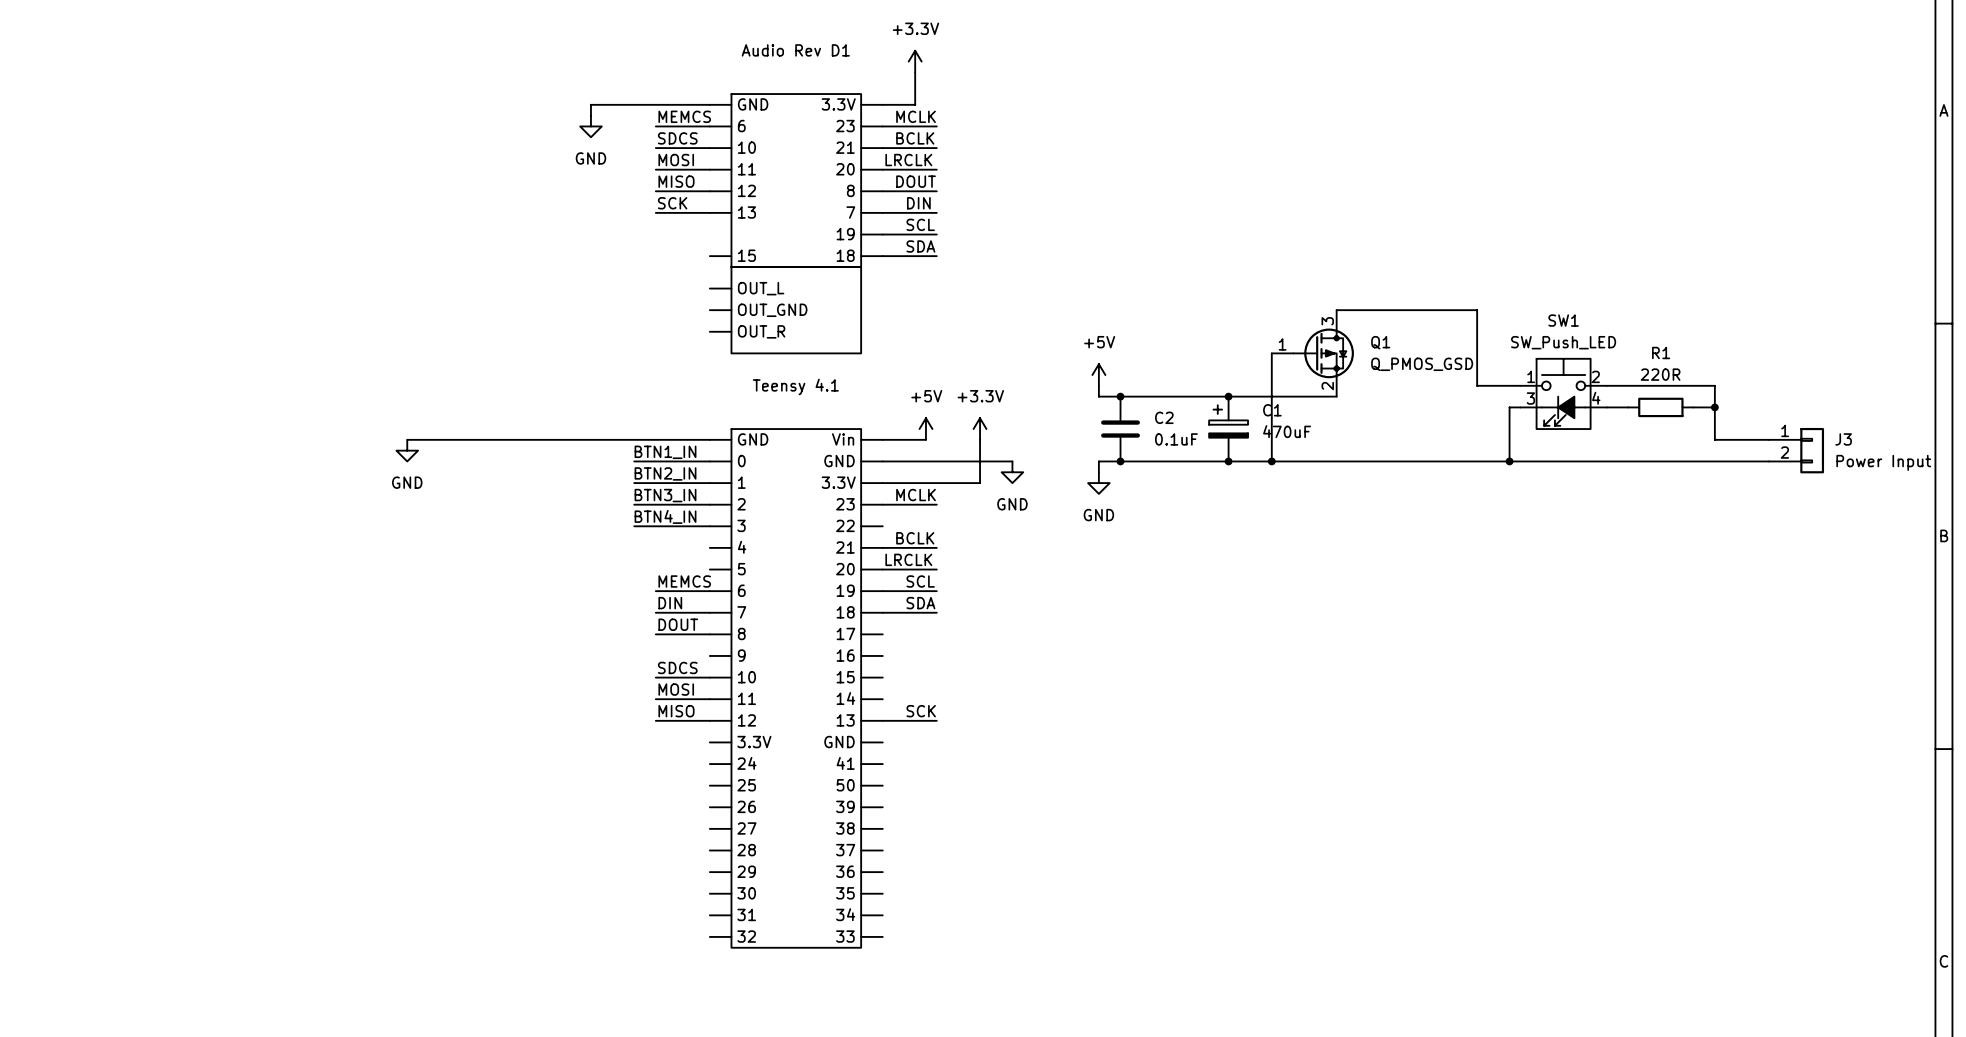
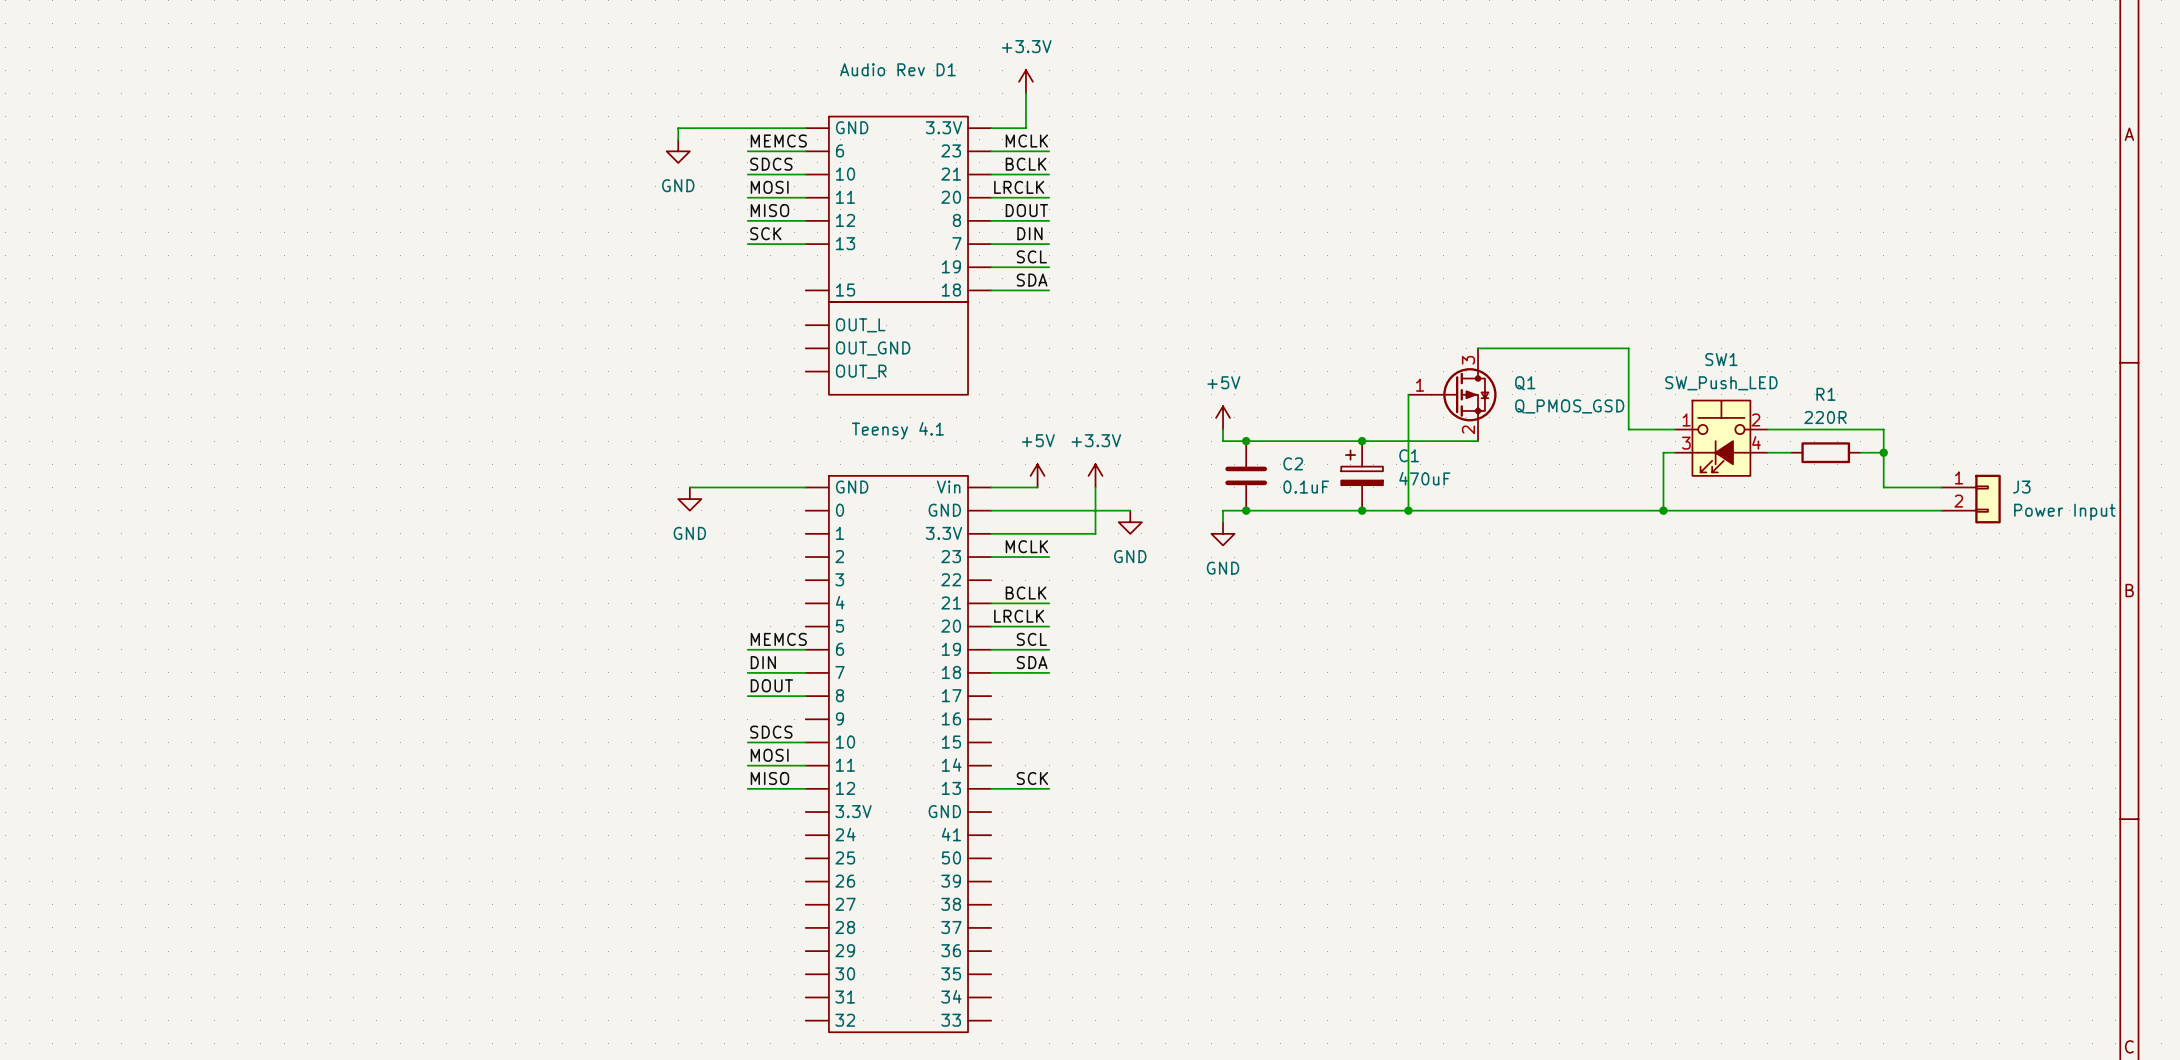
wire: (407, 439) (601, 439) -> none
power symbol position: GND (407, 450) -> GND (689, 499)
label: BTN1_IN (665, 452) -> none
wire: (634, 461) (709, 461) -> none
label: BTN2_IN (665, 473) -> none
wire: (634, 483) (709, 483) -> none
label: BTN3_IN (665, 495) -> none
wire: (634, 504) (709, 504) -> none
label: BTN4_IN (665, 516) -> none
wire: (634, 526) (709, 526) -> none

